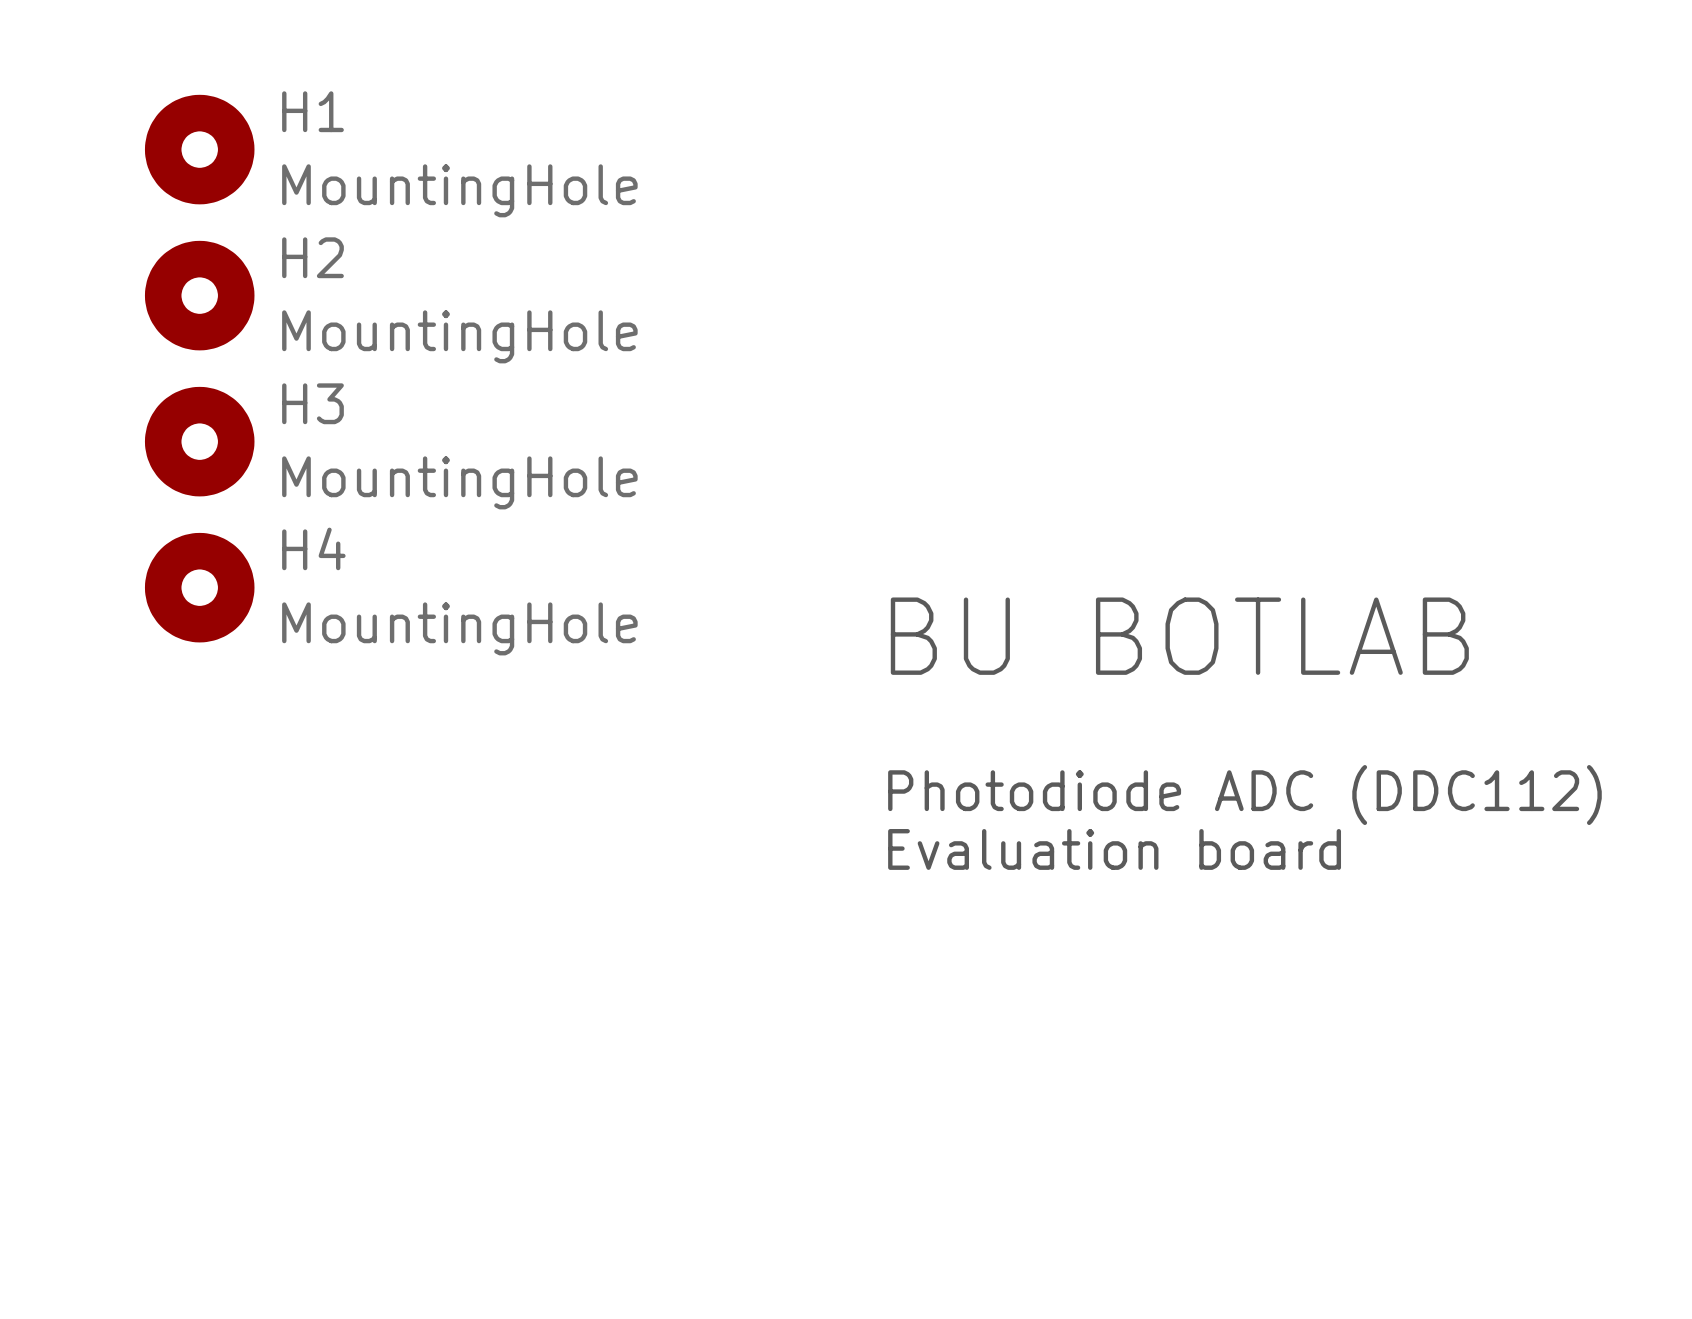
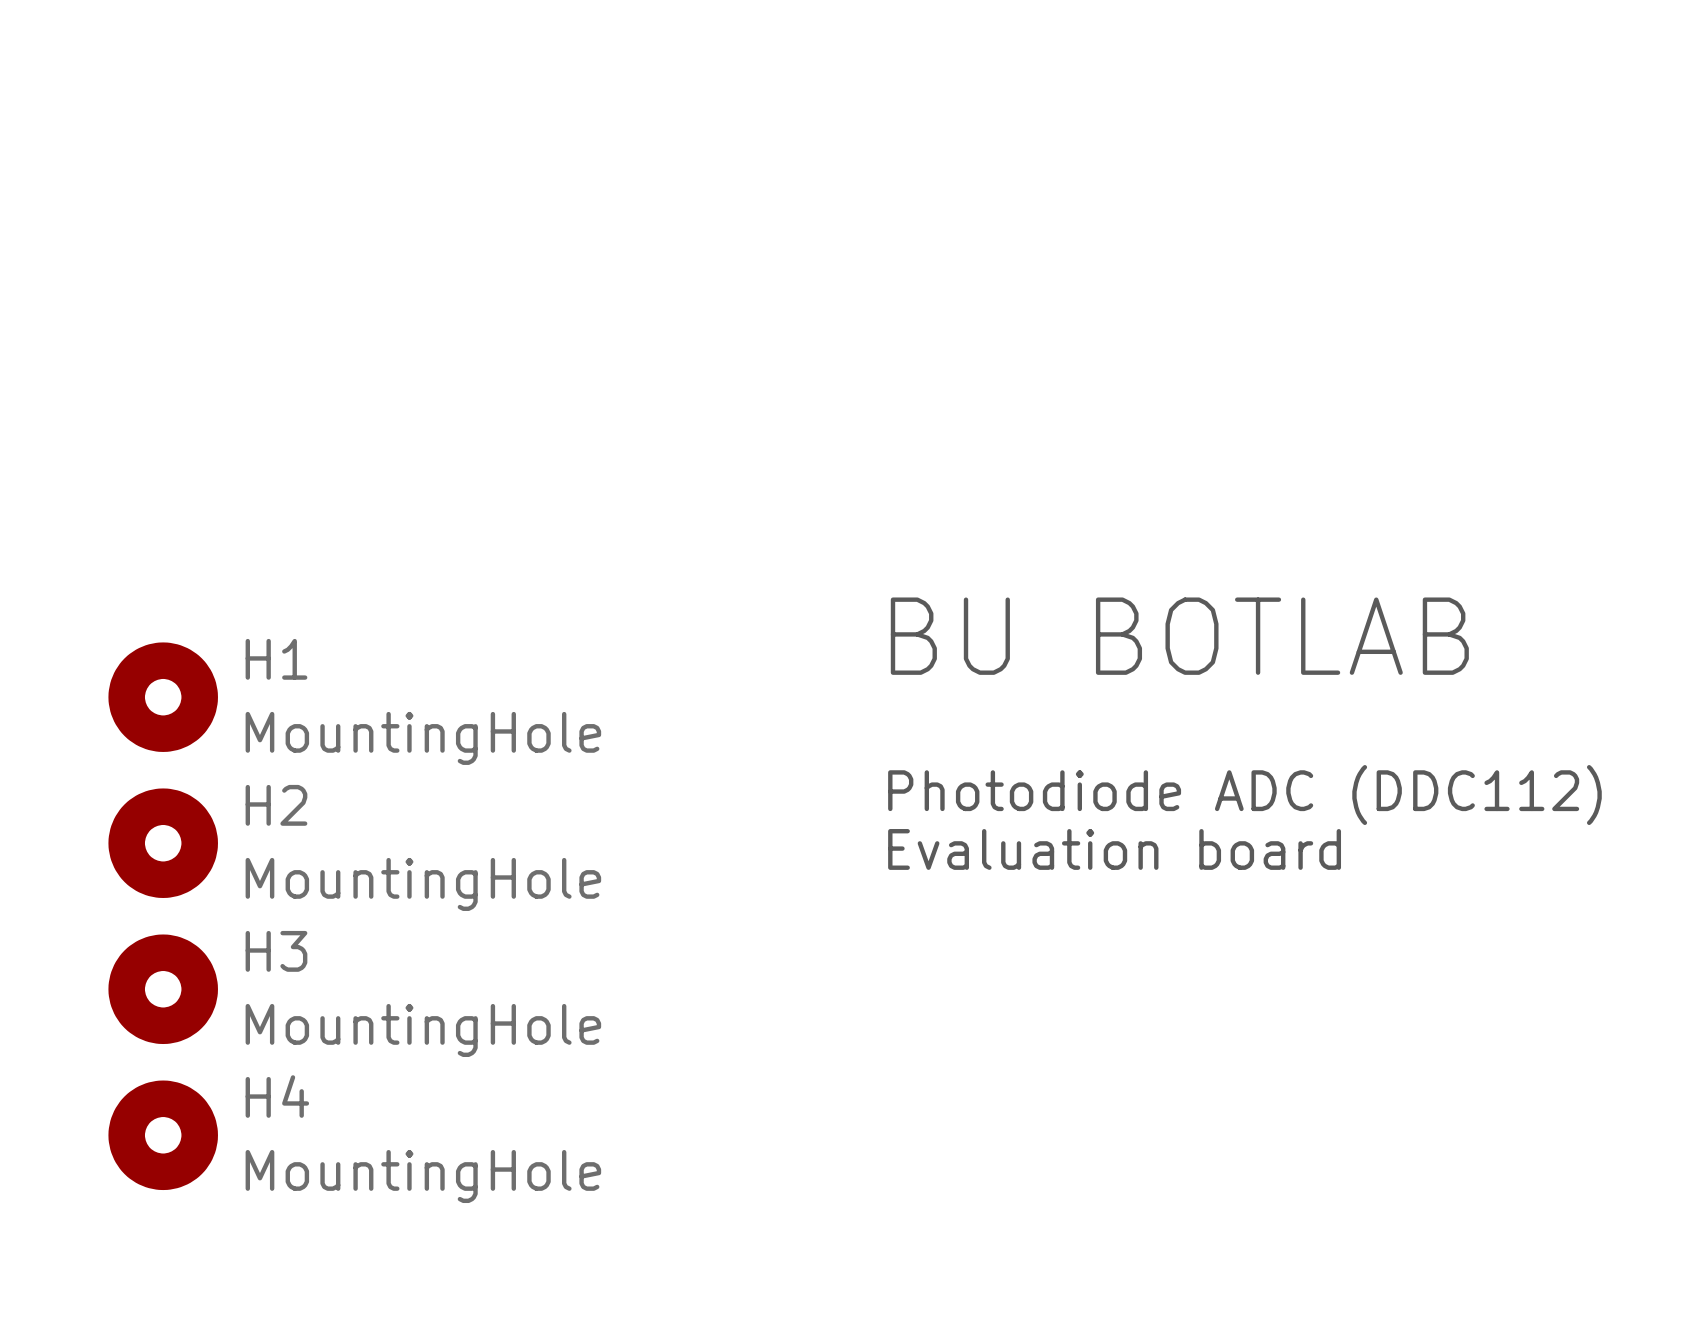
H1 position: (199, 149) -> (163, 697)
H2 position: (199, 295) -> (163, 843)
H3 position: (199, 441) -> (163, 989)
H4 position: (199, 587) -> (163, 1135)

